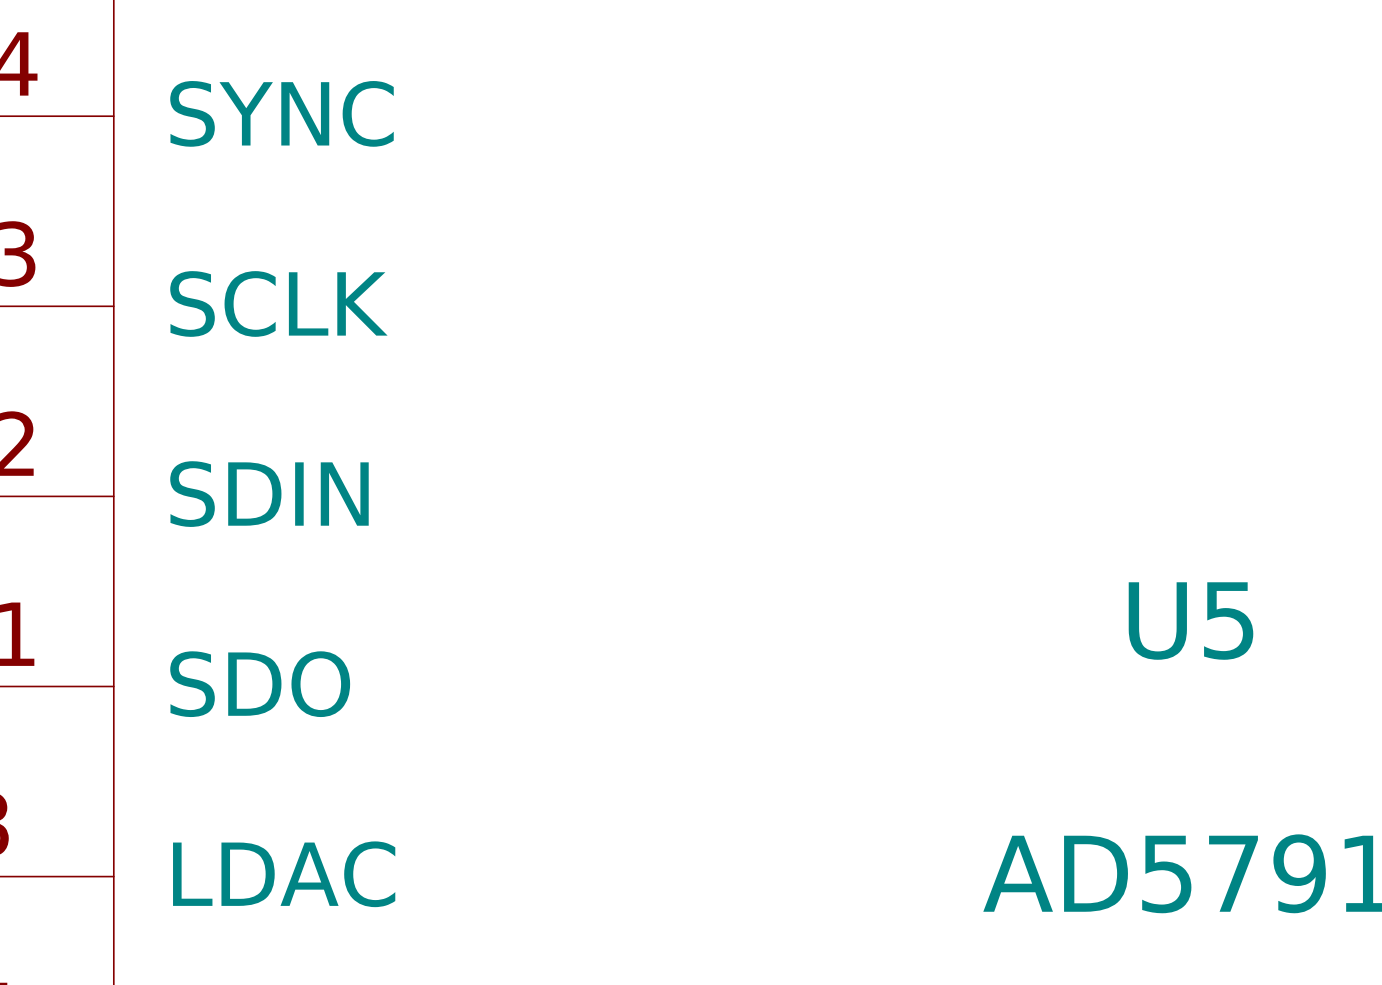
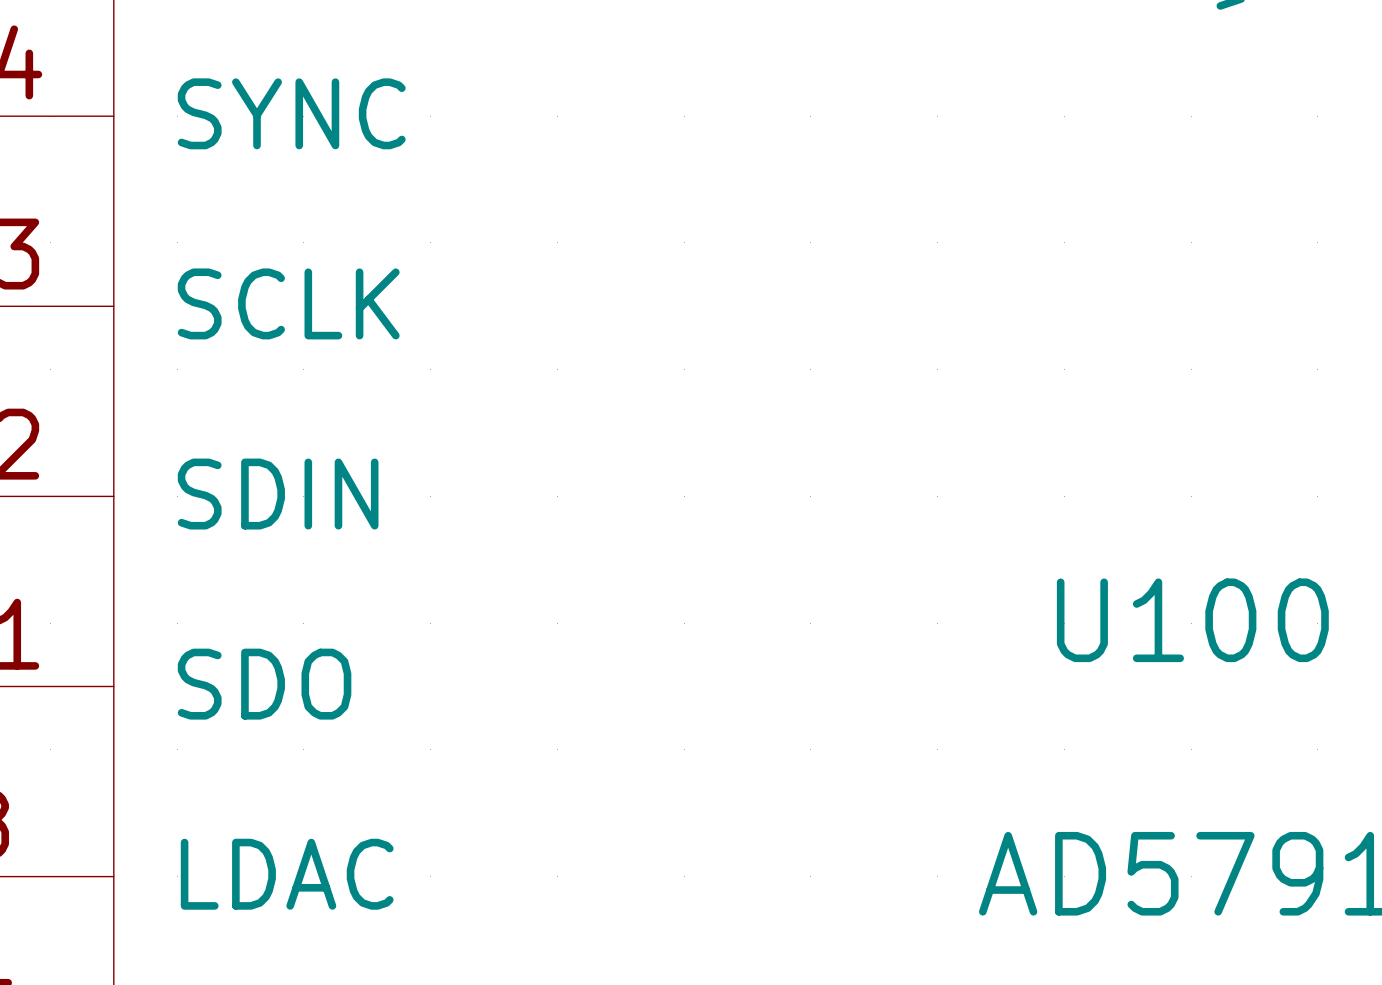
U5 name: U5 (1191, 621) -> U100 (1192, 620)

